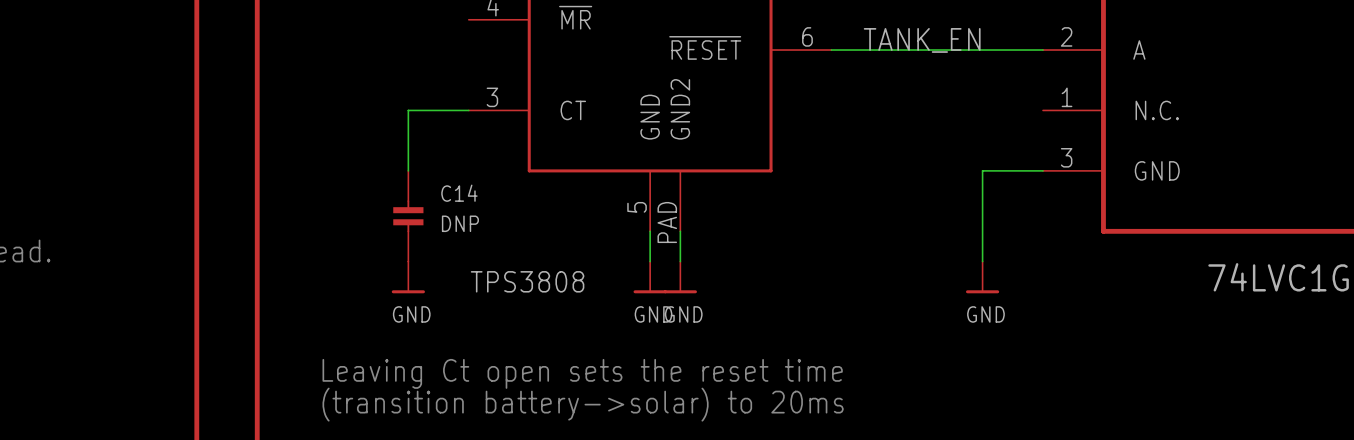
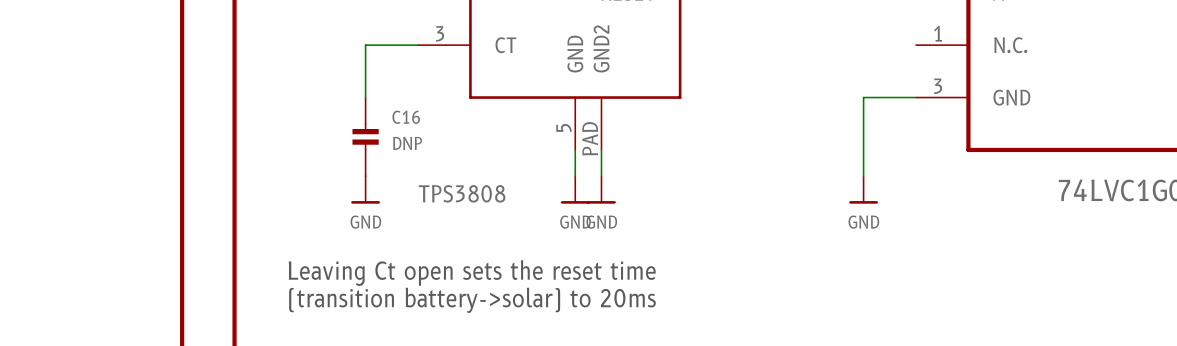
C14 name: C14 (459, 193) -> C16 (406, 117)

